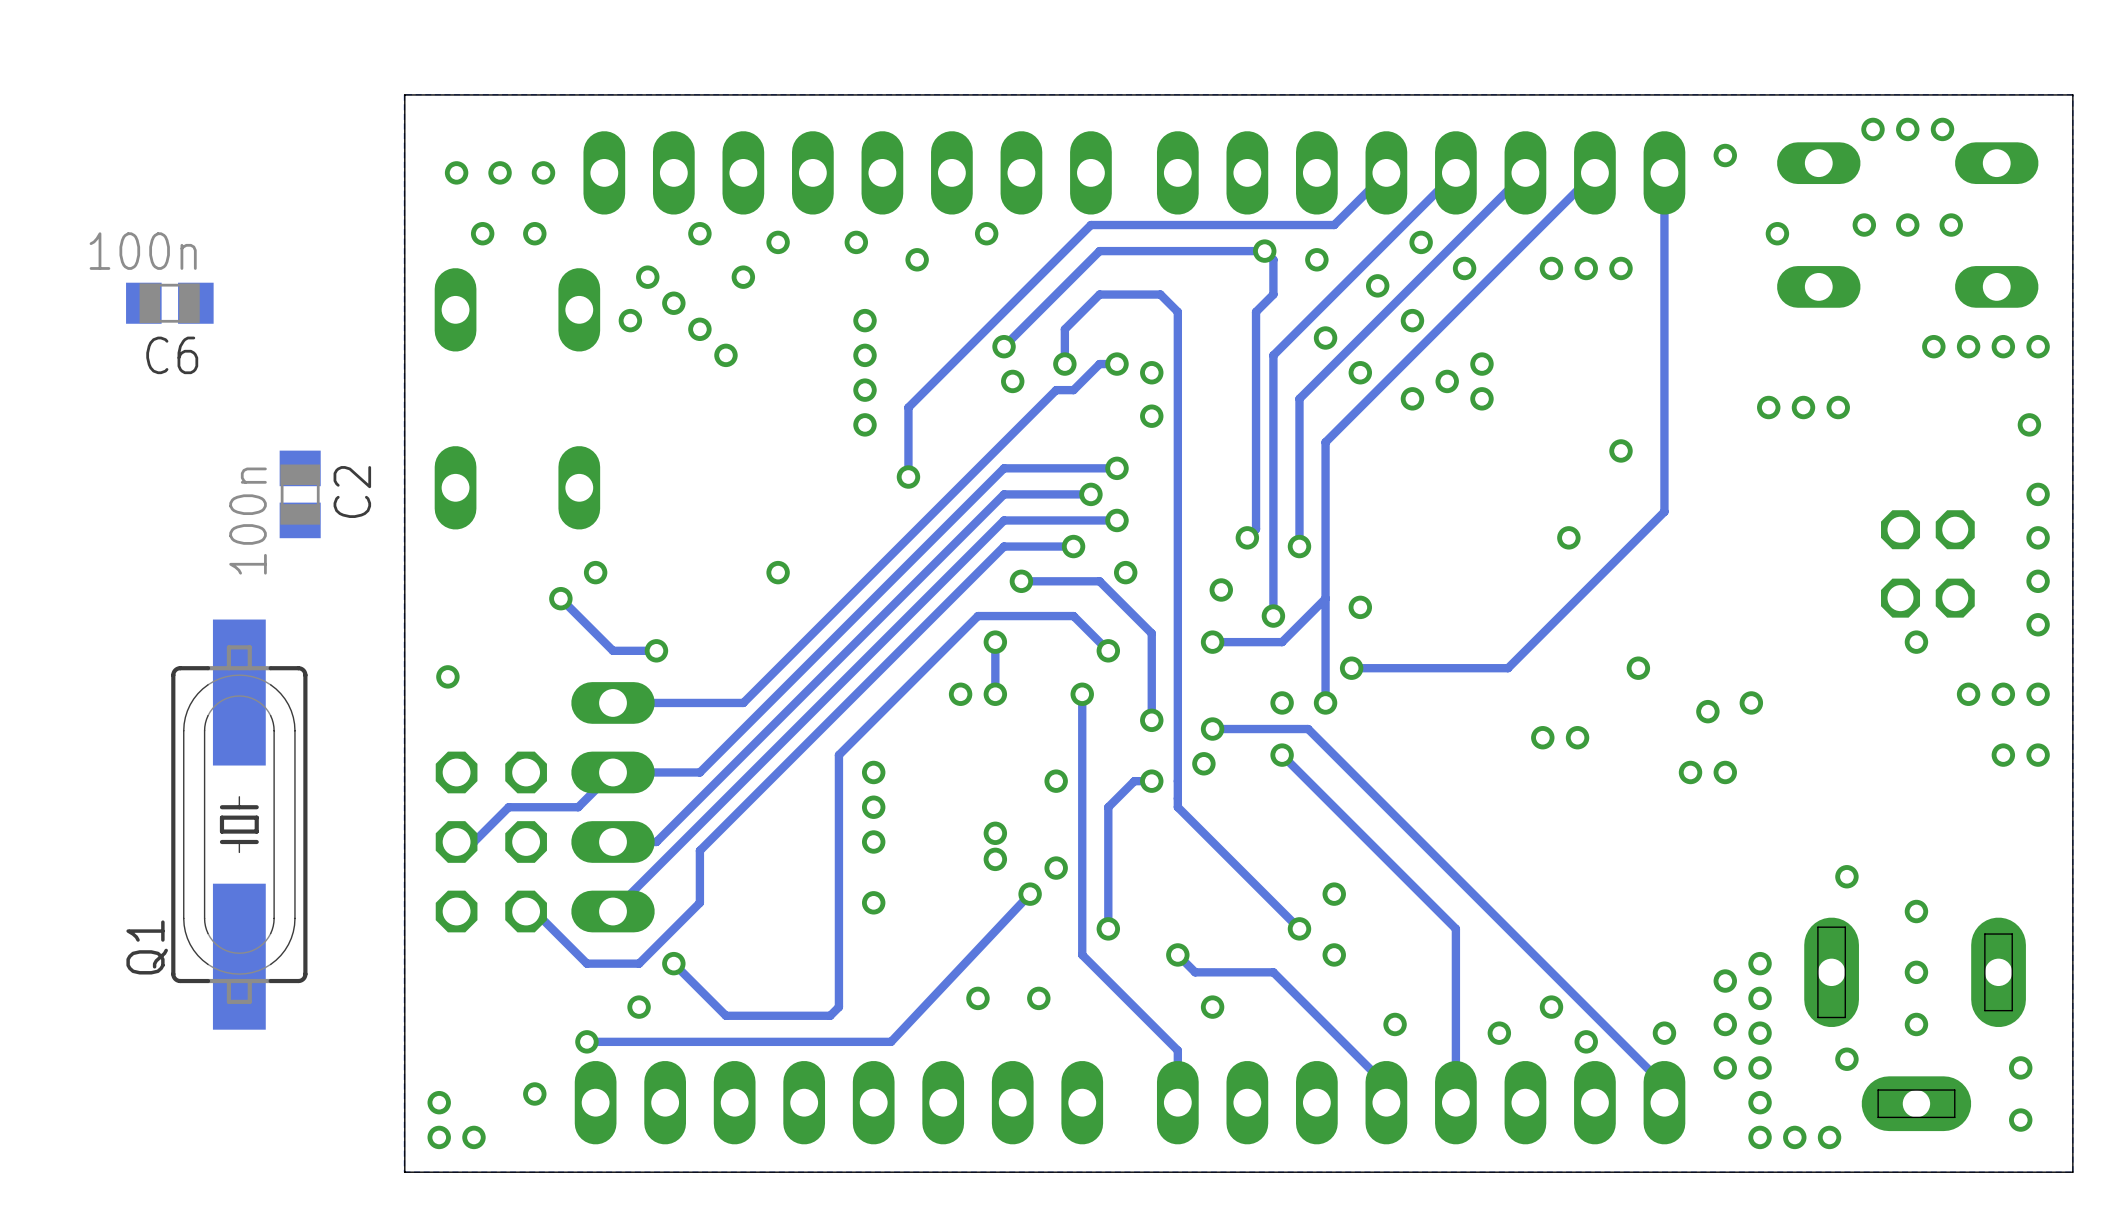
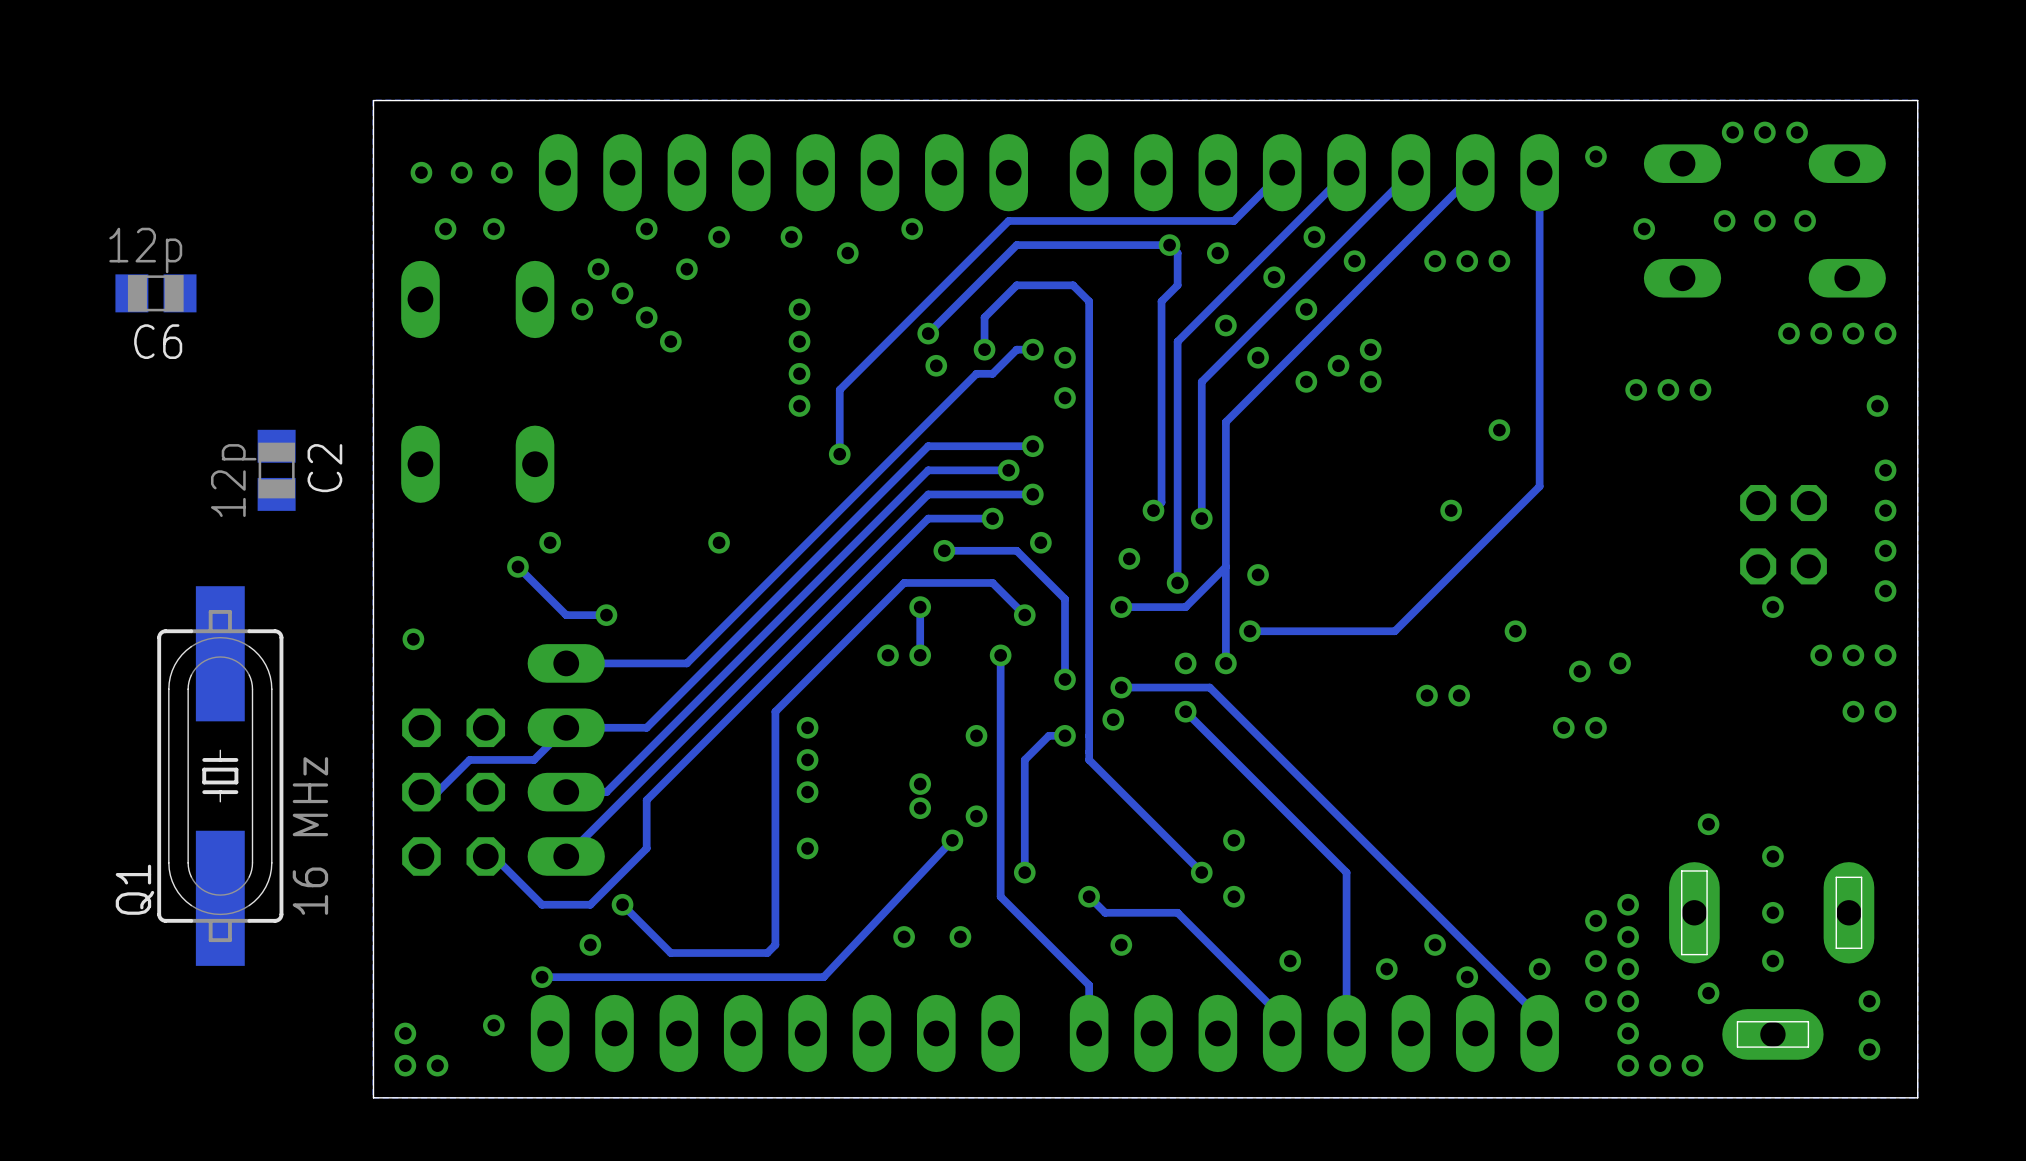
C6 value: 100n (143, 251) -> 12p (145, 250)
C2 value: 100n (248, 521) -> 12p (233, 480)
Q1 value: none -> 16 MHz (310, 835)

